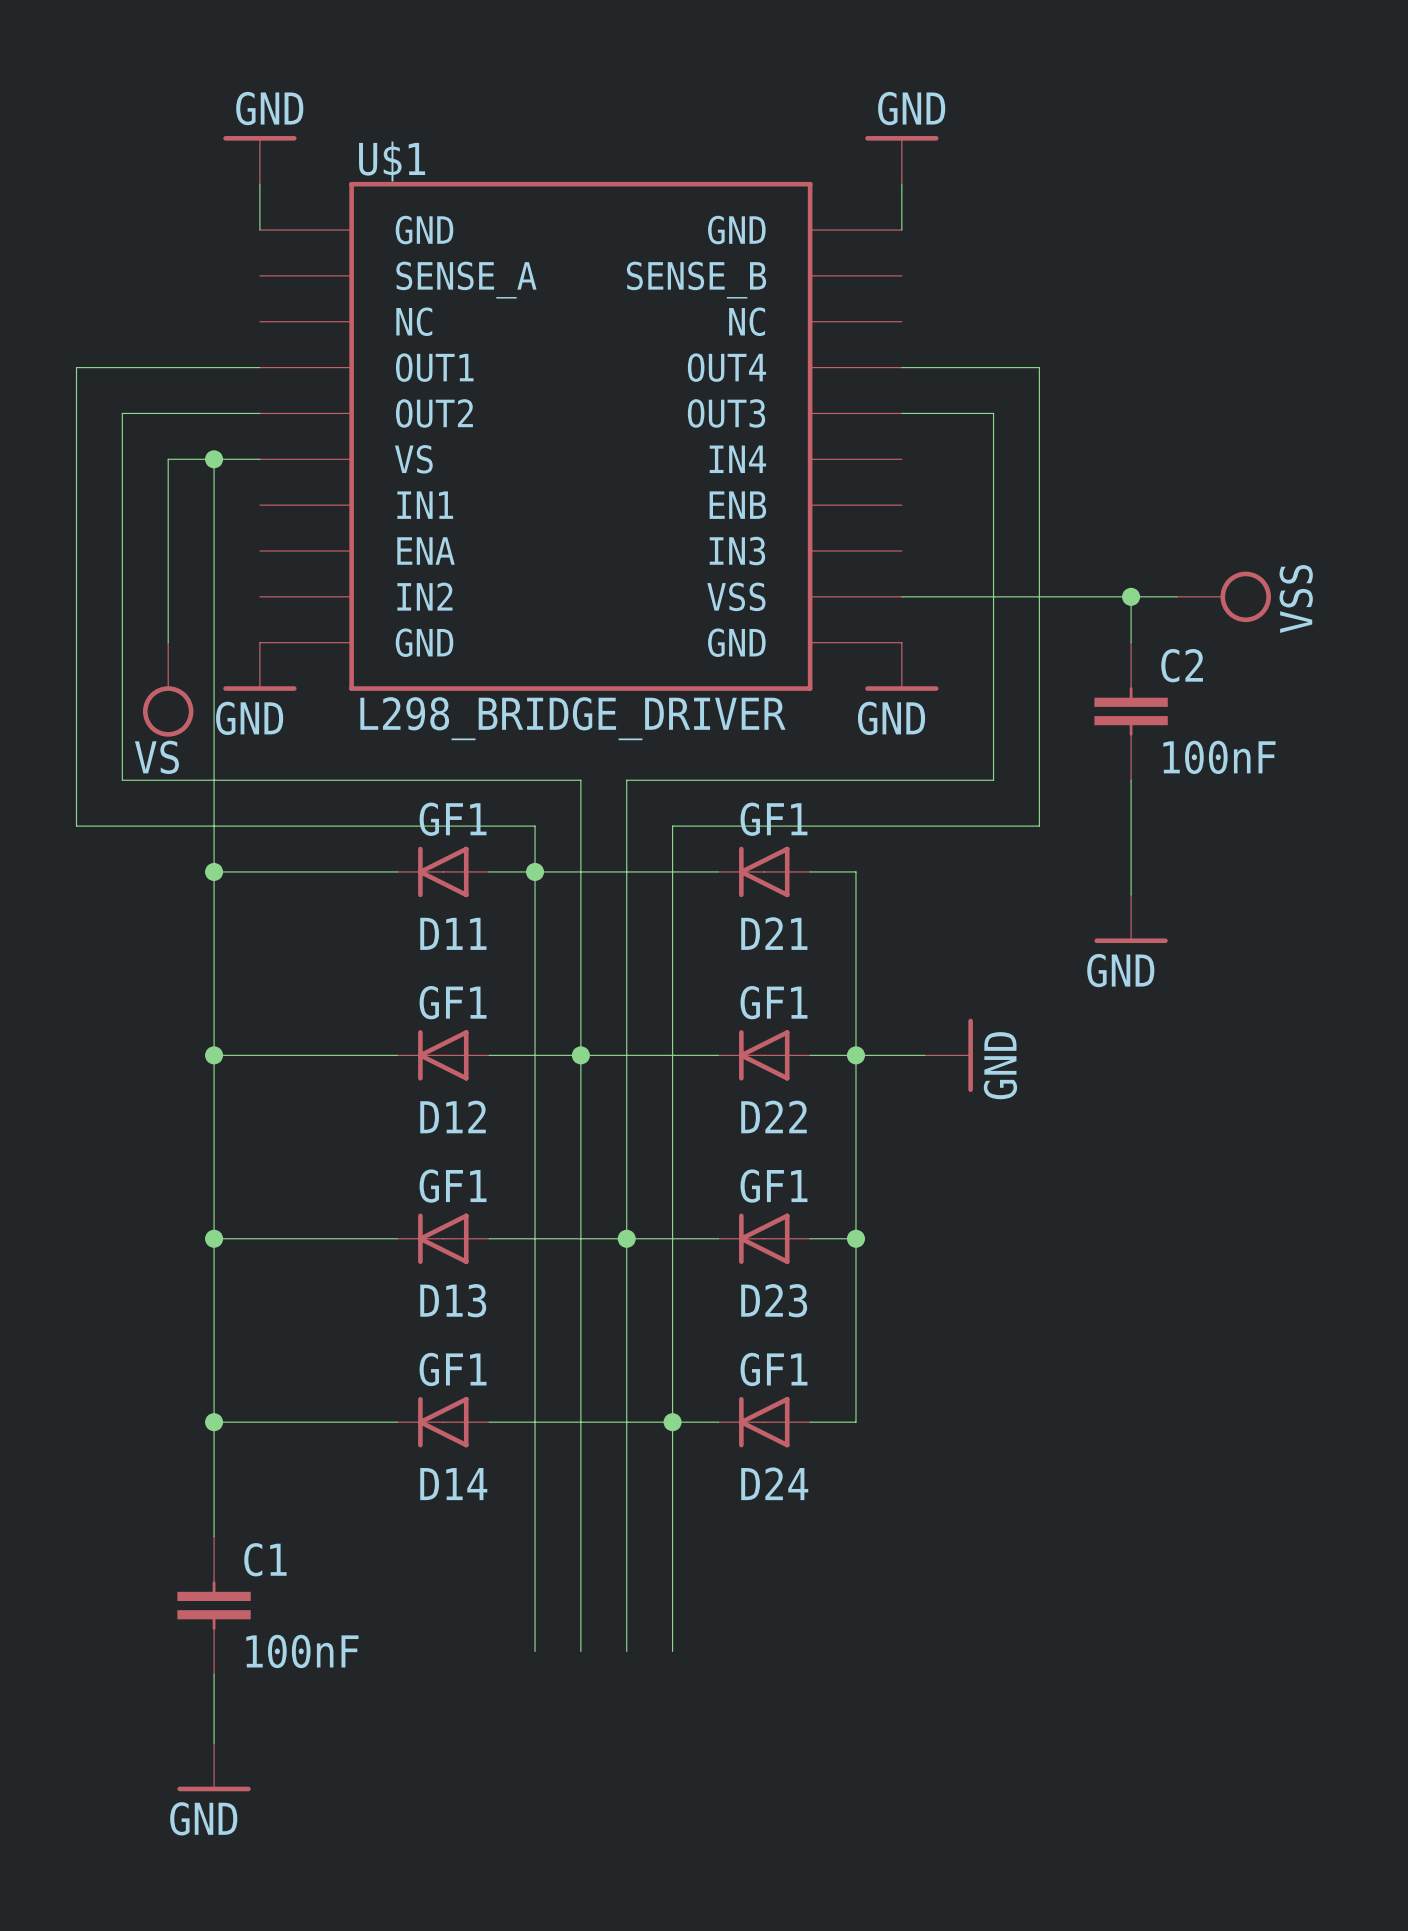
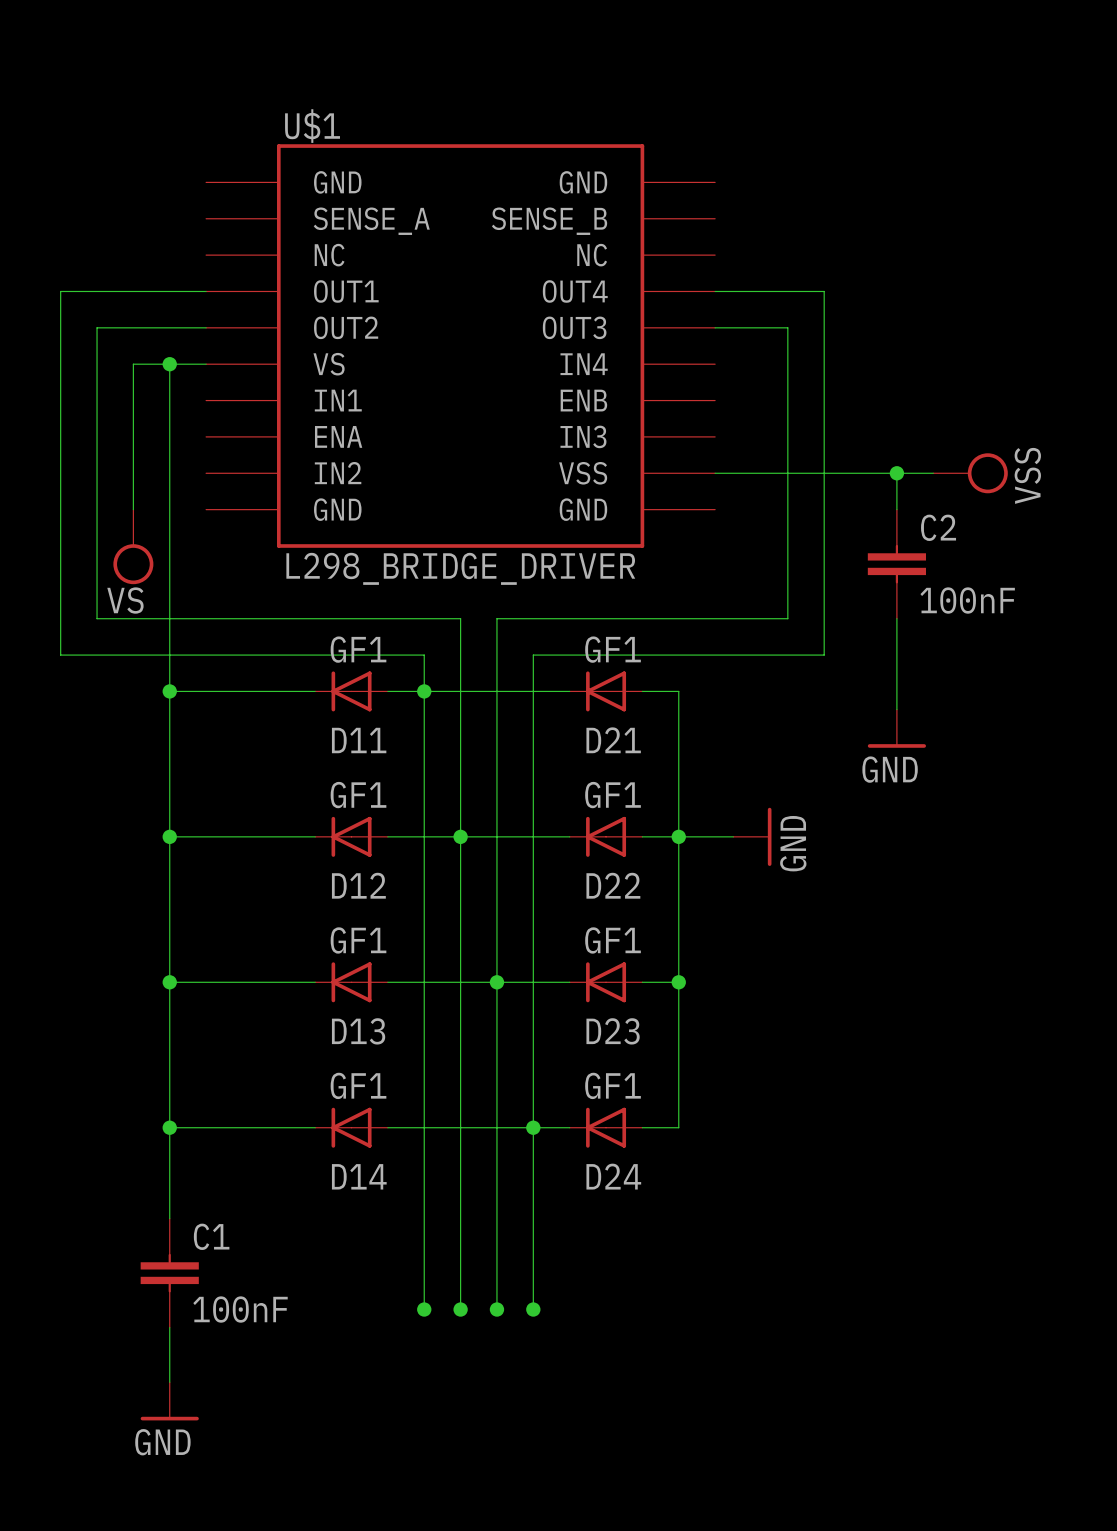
power symbol: GND (259, 160) -> none
power symbol: GND (901, 160) -> none
wire: (259, 184) (259, 230) -> none
wire: (901, 184) (901, 230) -> none
power symbol: GND (259, 666) -> none
power symbol: GND (901, 666) -> none
junction: none -> (424, 1309)
junction: none -> (460, 1309)
junction: none -> (496, 1309)
junction: none -> (533, 1309)

